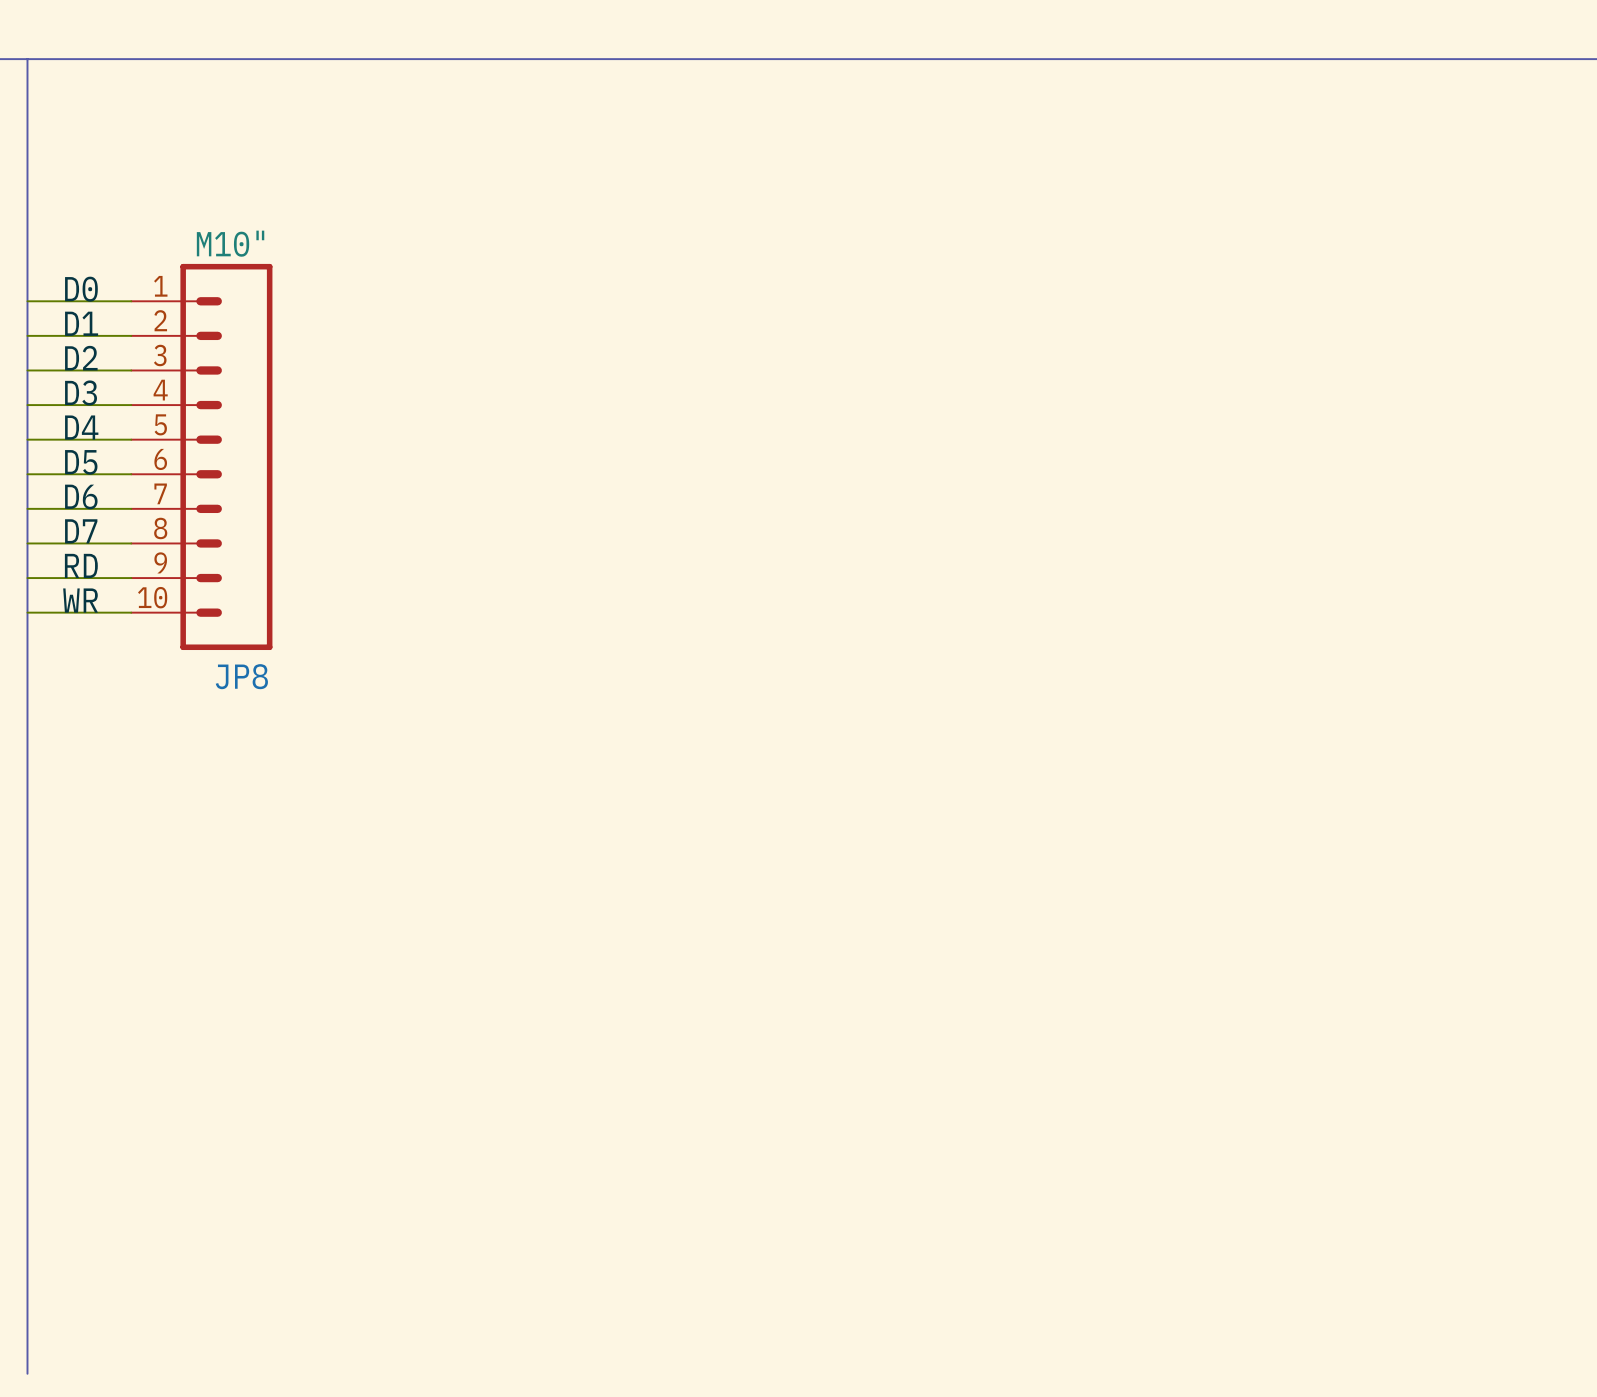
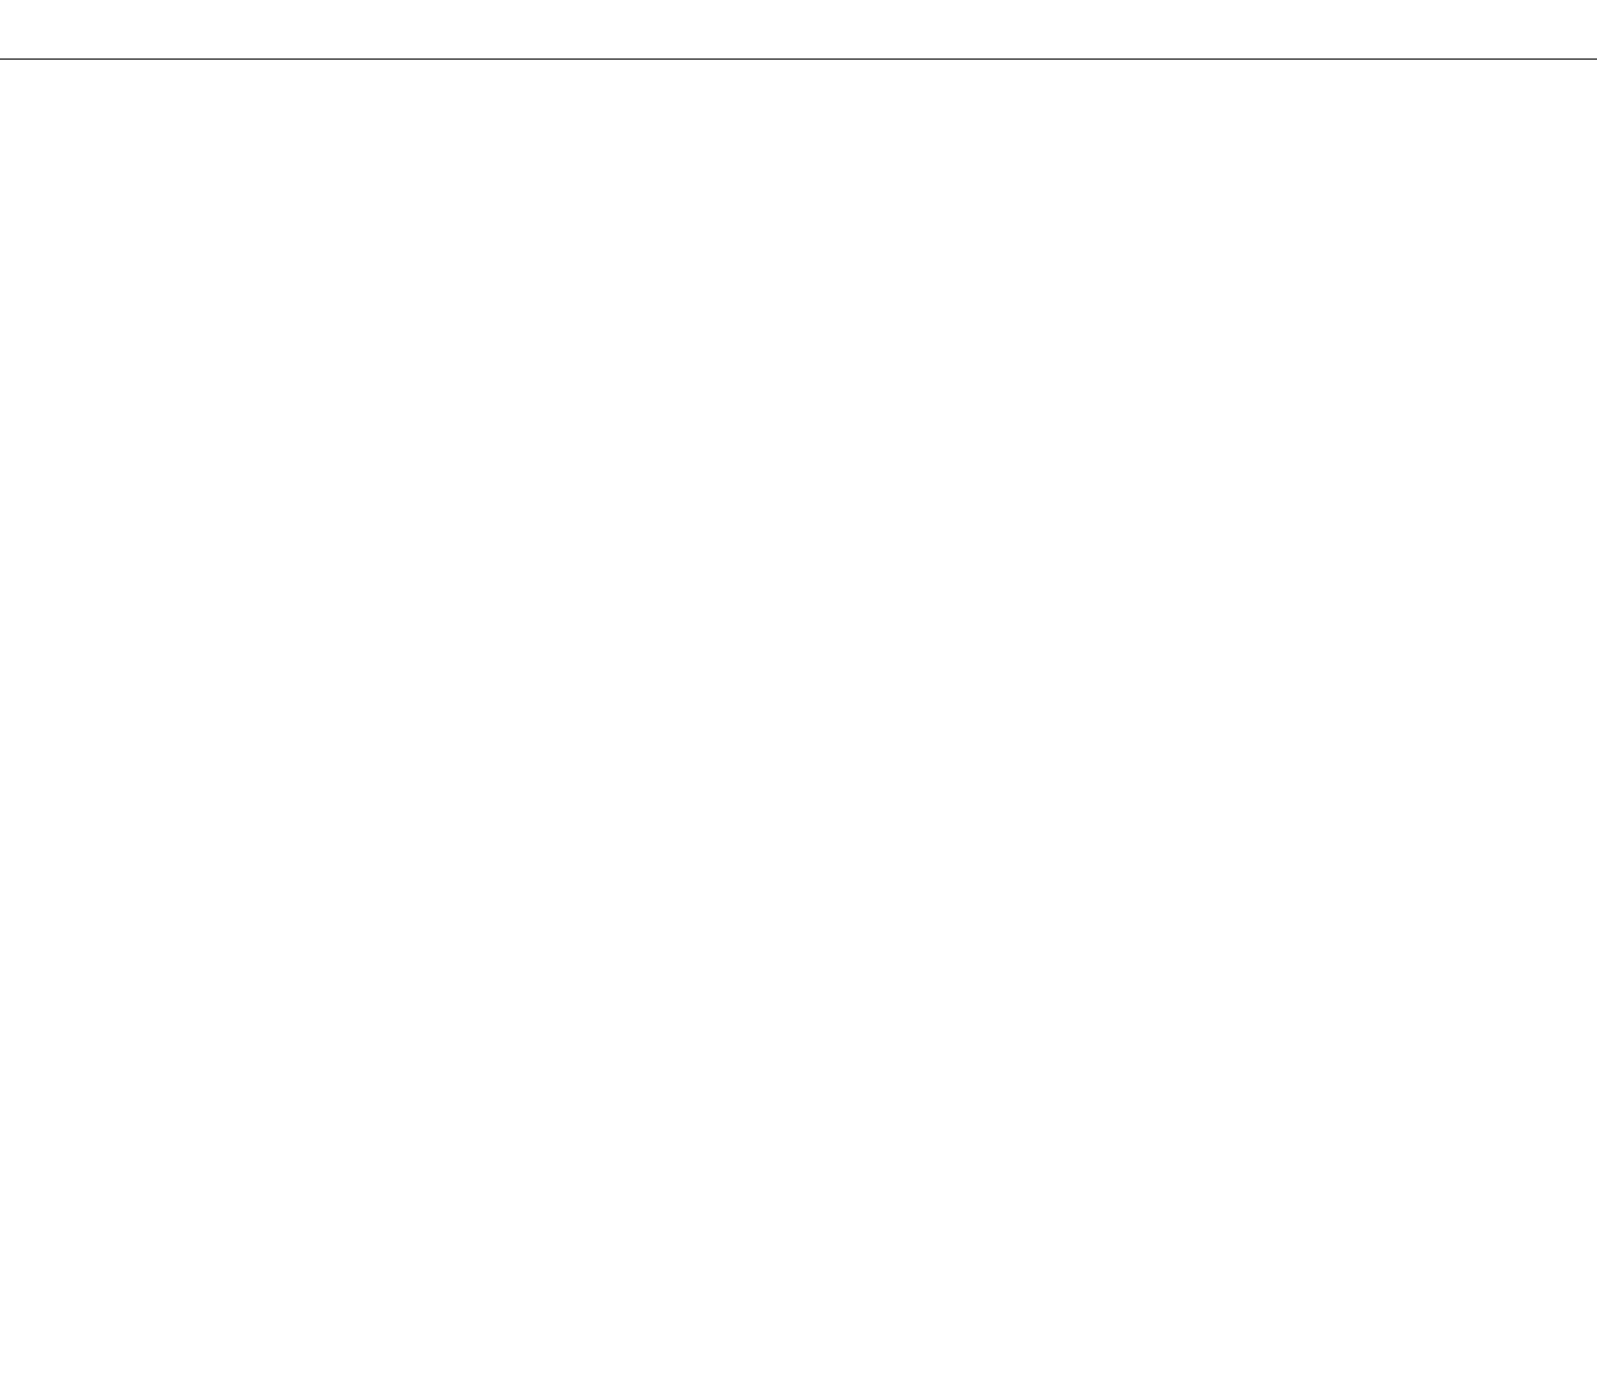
bus: (27, 59) (27, 1373) -> none
label: D0 (81, 289) -> none
wire: (27, 301) (131, 301) -> none
label: D1 (81, 323) -> none
wire: (27, 335) (131, 335) -> none
label: D2 (81, 358) -> none
wire: (27, 370) (131, 370) -> none
label: D3 (81, 392) -> none
wire: (27, 405) (131, 405) -> none
label: D4 (81, 427) -> none
wire: (27, 439) (131, 439) -> none
JP8: M10" (201, 456) -> none
label: D5 (81, 462) -> none
wire: (27, 474) (131, 474) -> none
label: D6 (81, 496) -> none
wire: (27, 508) (131, 508) -> none
label: D7 (81, 531) -> none
wire: (27, 543) (131, 543) -> none
label: RD (81, 565) -> none
wire: (27, 578) (131, 578) -> none
label: WR (80, 600) -> none
wire: (27, 612) (131, 612) -> none

